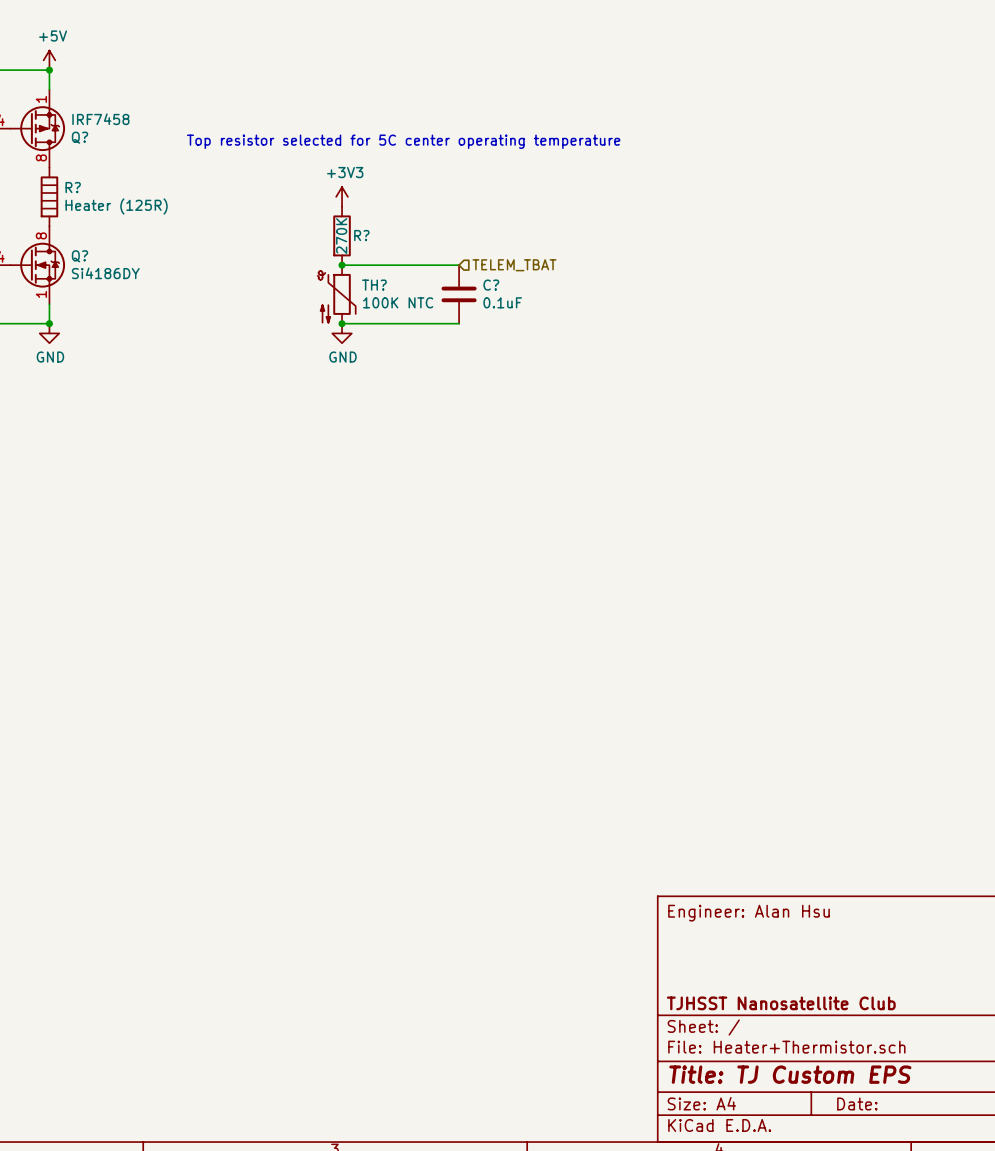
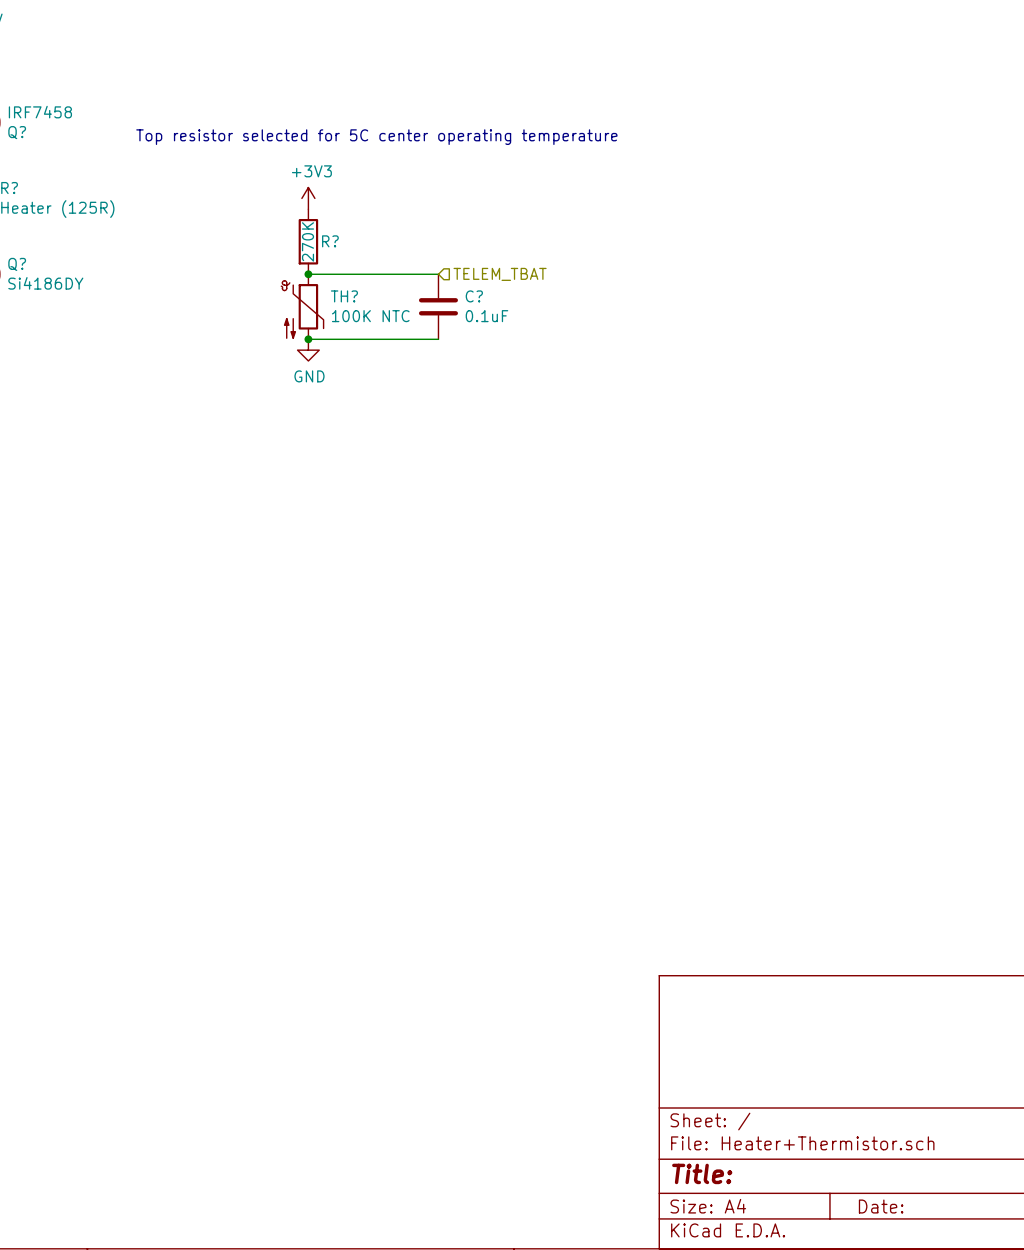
title block: Engineer: Alan Hsu (749, 913) -> none
title block: TJHSST Nanosatellite Club (781, 1003) -> none
title block: Title: TJ Custom EPS (790, 1074) -> Title: (702, 1173)

